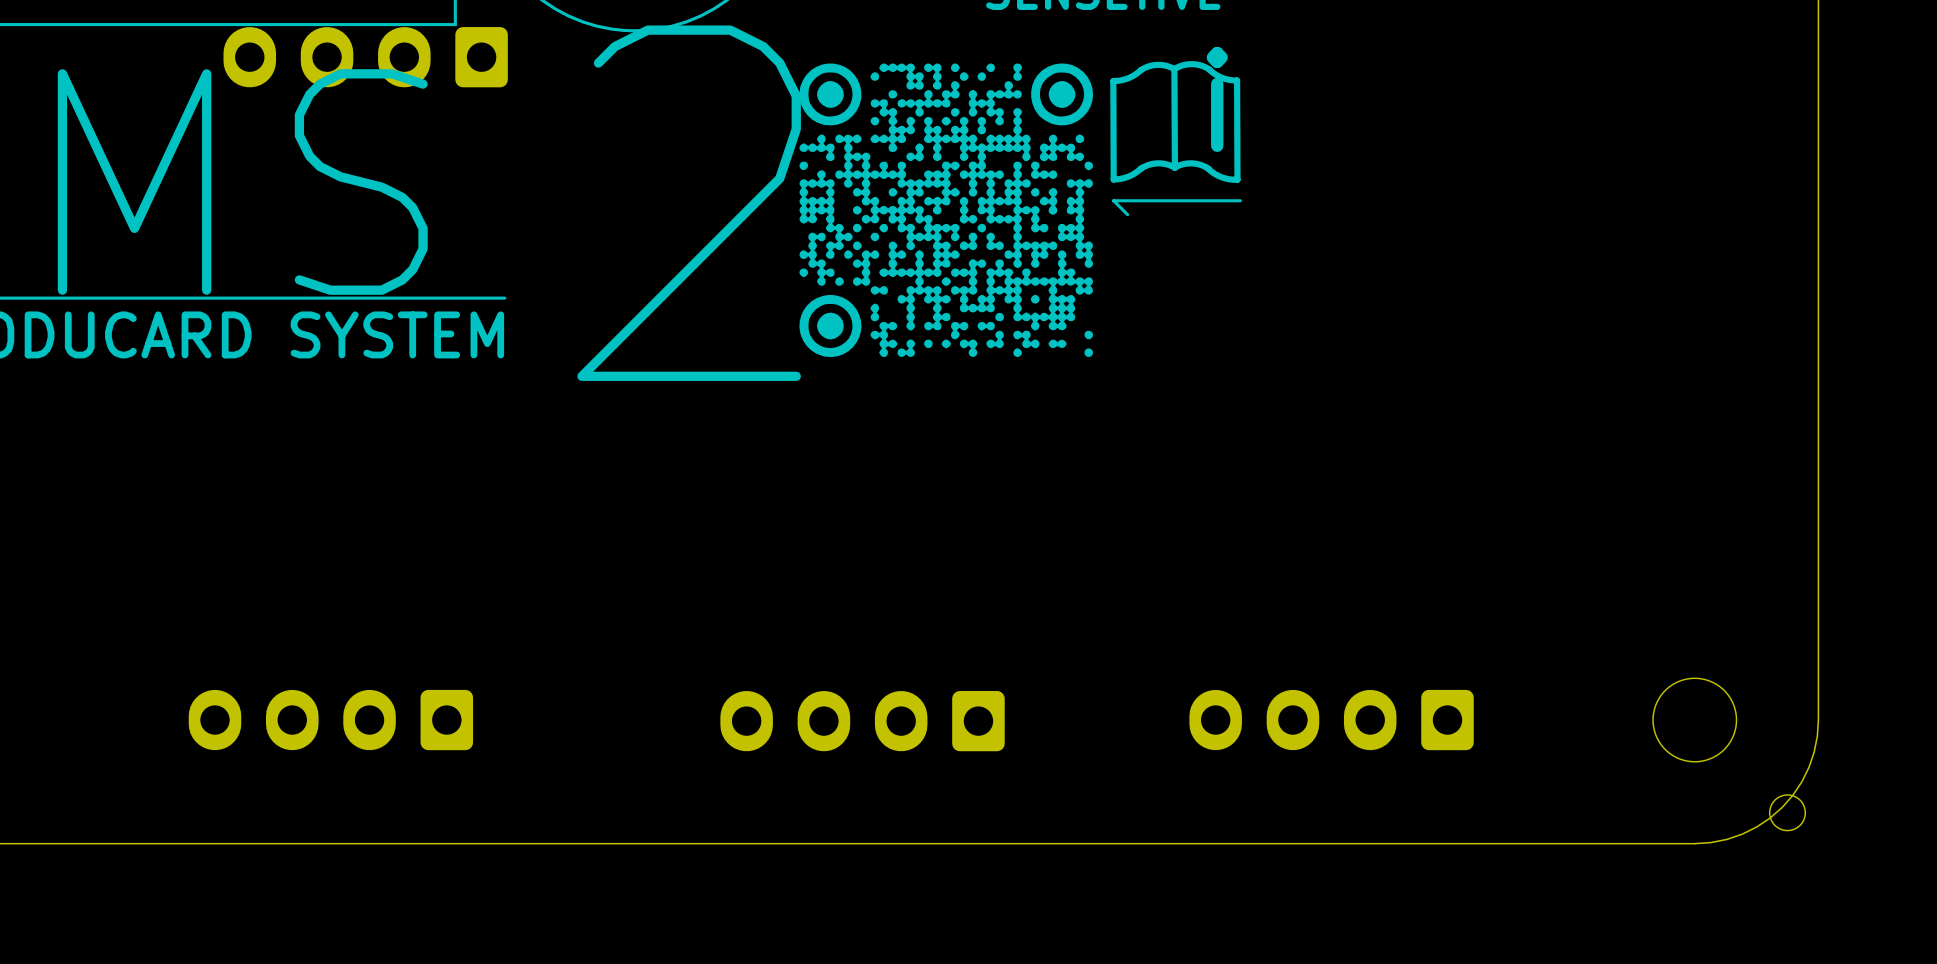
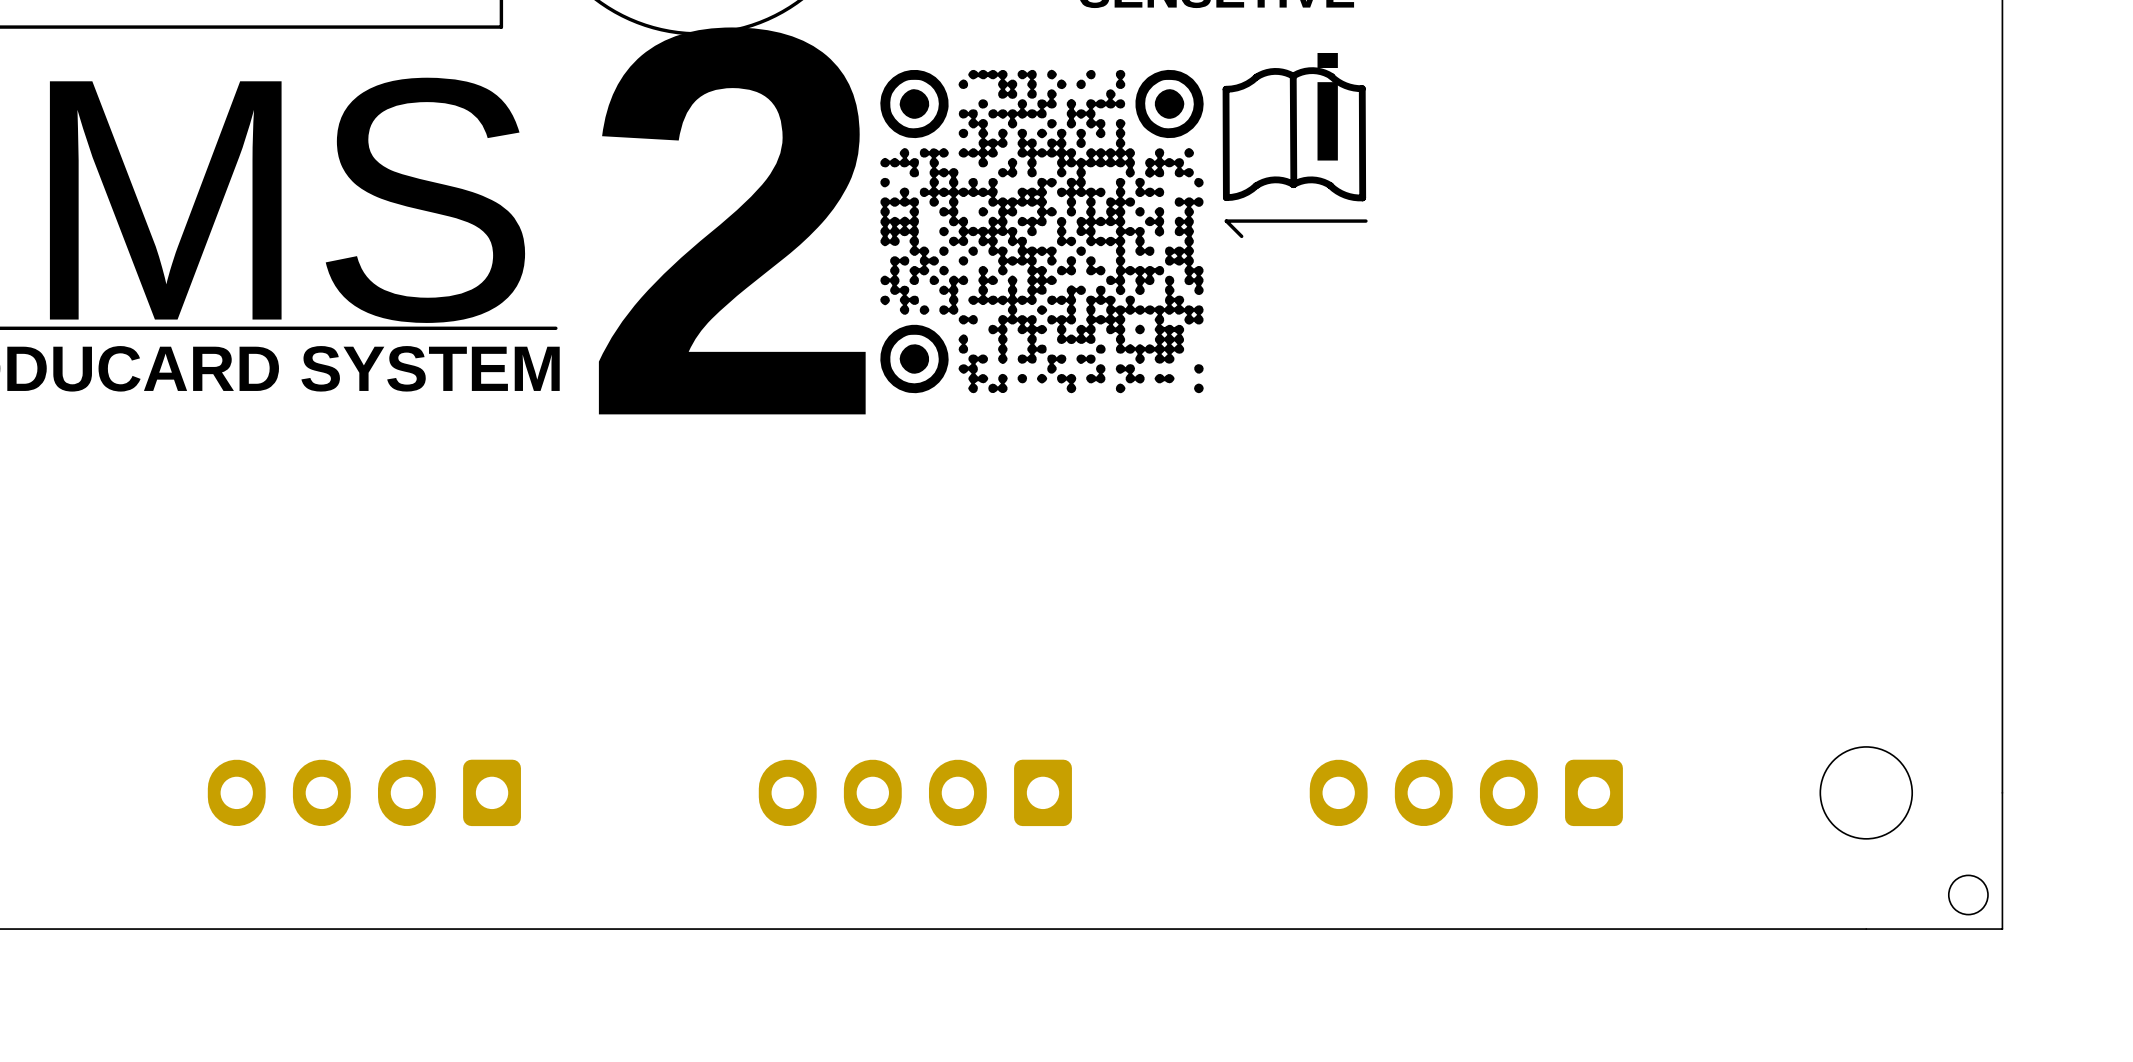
part: (365, 57) -> none
board edge: (1818, 720) (1814, 752) (1809, 767) (1792, 795) (1782, 807) (1770, 818) (1742, 834) (1726, 839) (1694, 843) -> (2002, 792) (2002, 929) (1866, 929)
part position: (862, 721) -> (915, 792)

